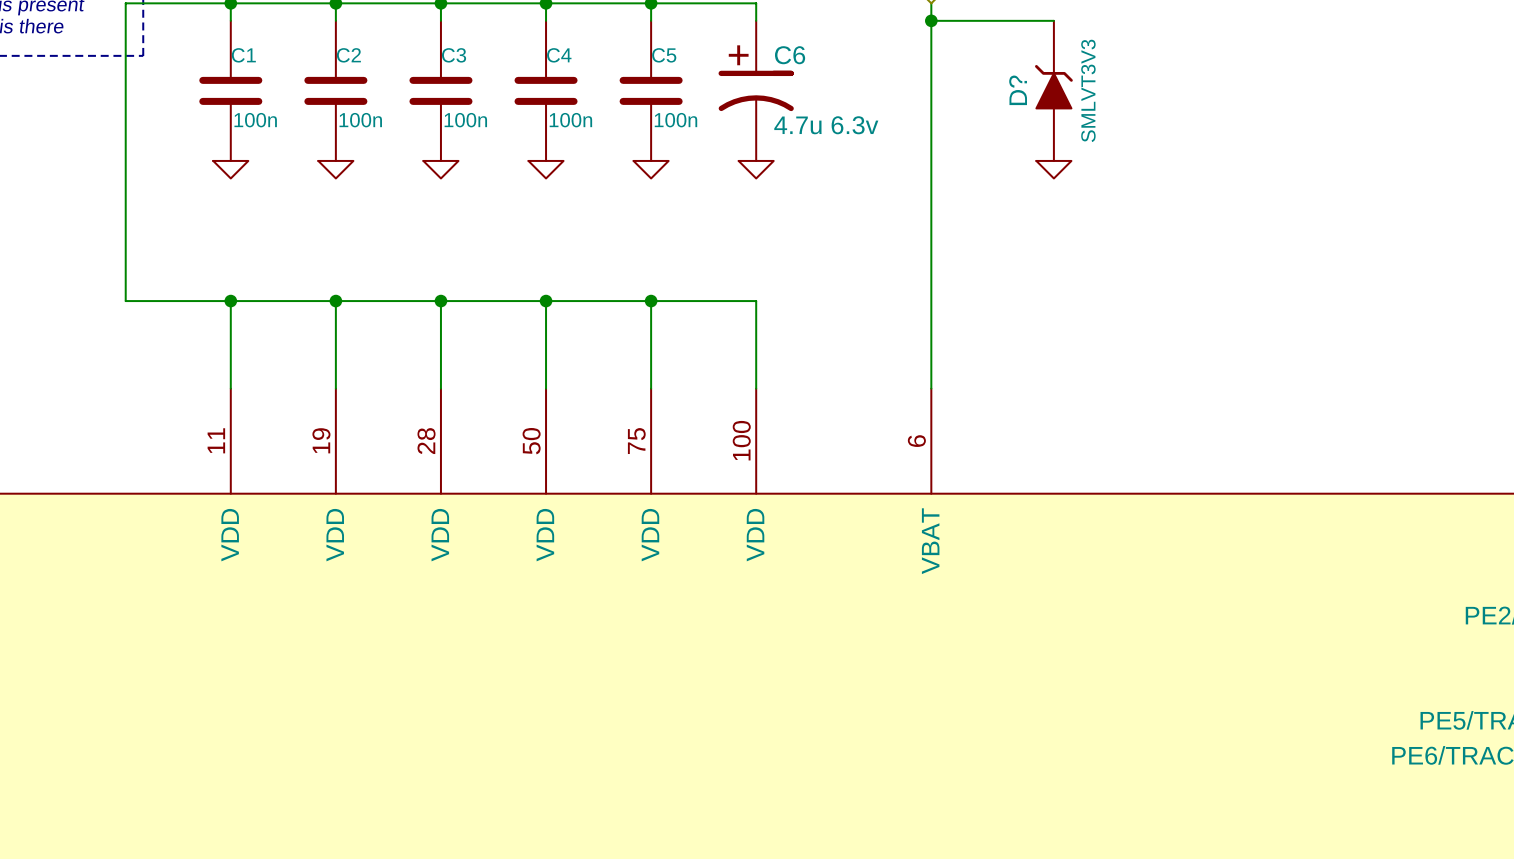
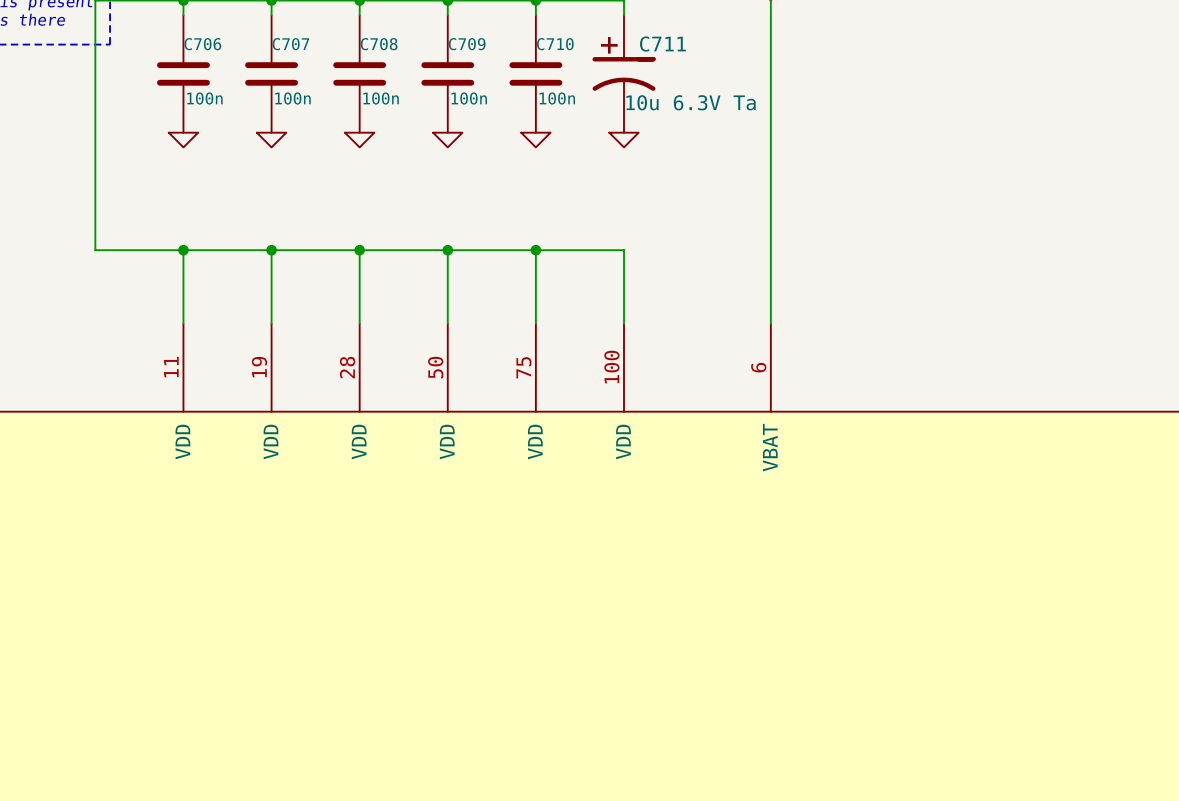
wire: (931, 20) (1053, 20) -> none
junction: (931, 20) -> none
C1 name: C1 (243, 55) -> C706 (202, 44)
C2 name: C2 (348, 55) -> C707 (290, 44)
C3 name: C3 (454, 55) -> C708 (379, 44)
C4 name: C4 (559, 55) -> C709 (467, 44)
C5 name: C5 (664, 55) -> C710 (555, 44)
C6 name: C6 (790, 55) -> C711 (662, 44)
D?: SMLVT3V3 (1053, 90) -> none
C6 value: 4.7u 6.3v (826, 125) -> 10u 6.3V Ta (691, 102)
power symbol: (1053, 169) -> none

